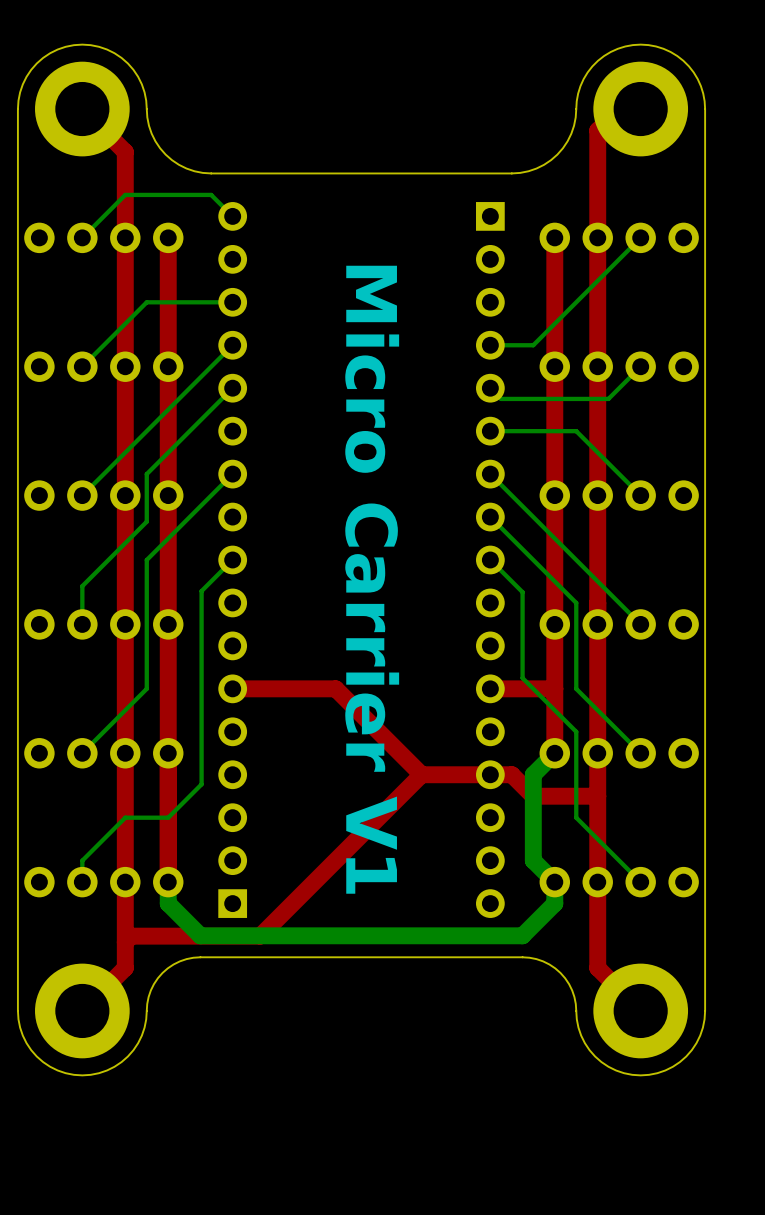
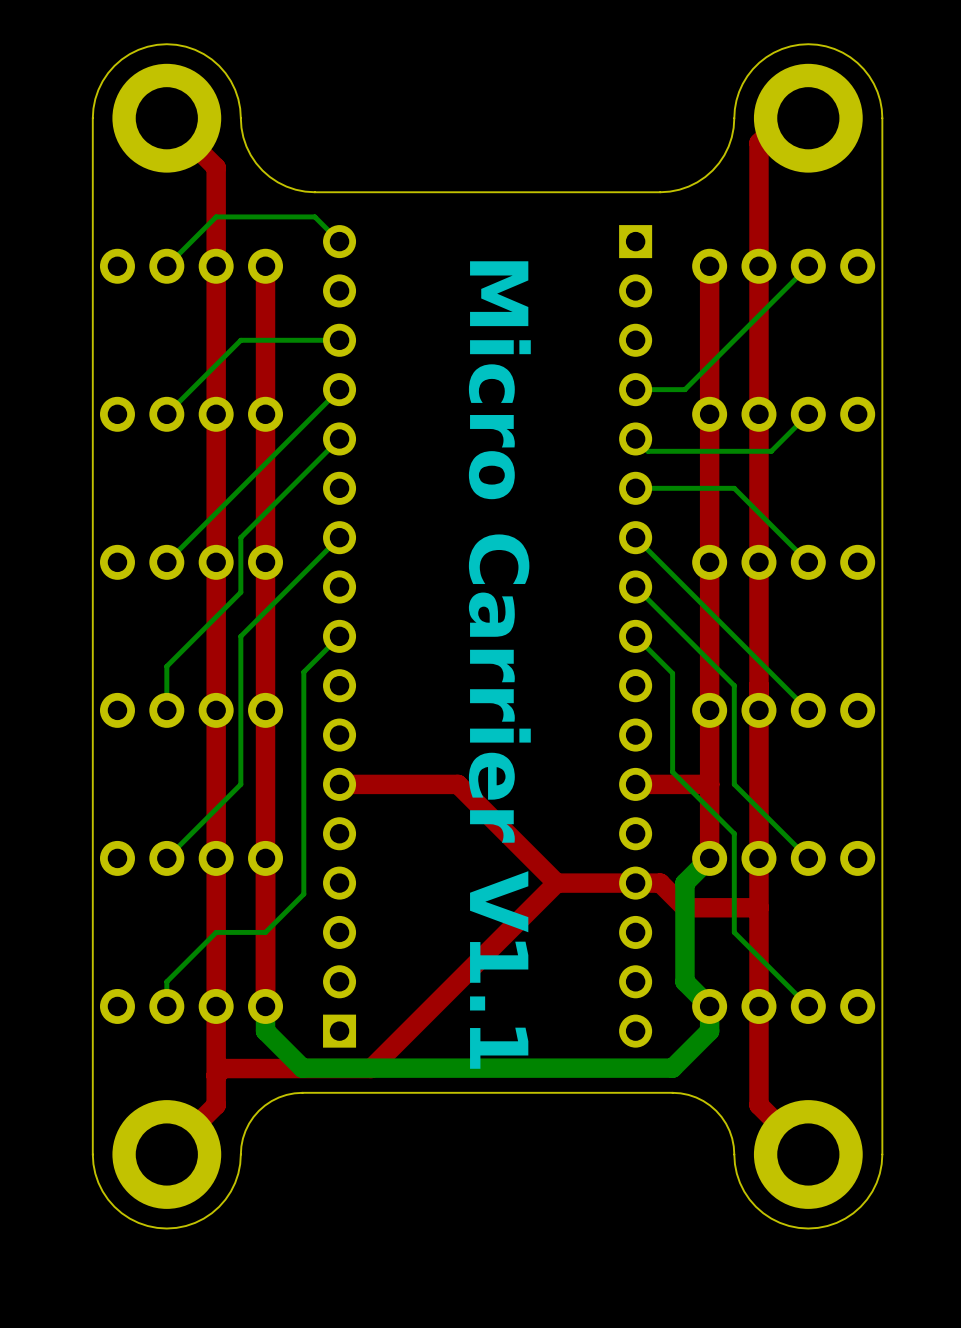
text: Micro Carrier V1 (372, 579) -> Micro Carrier V1.1 (499, 665)

